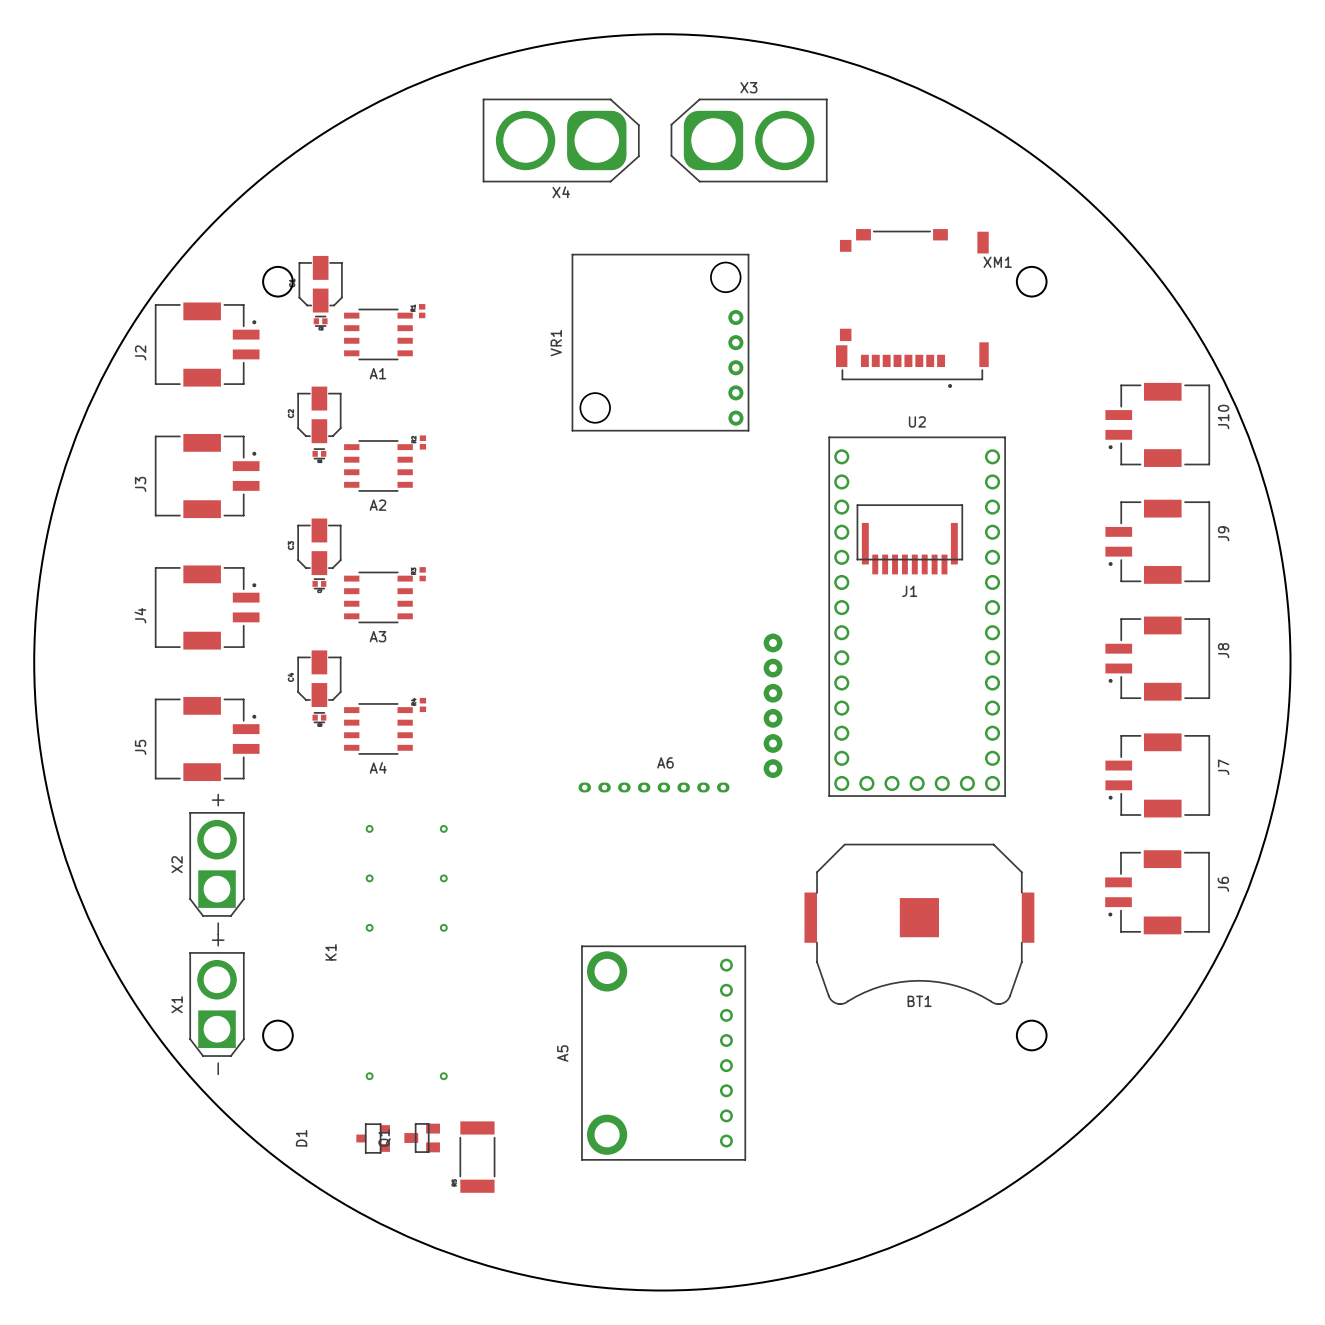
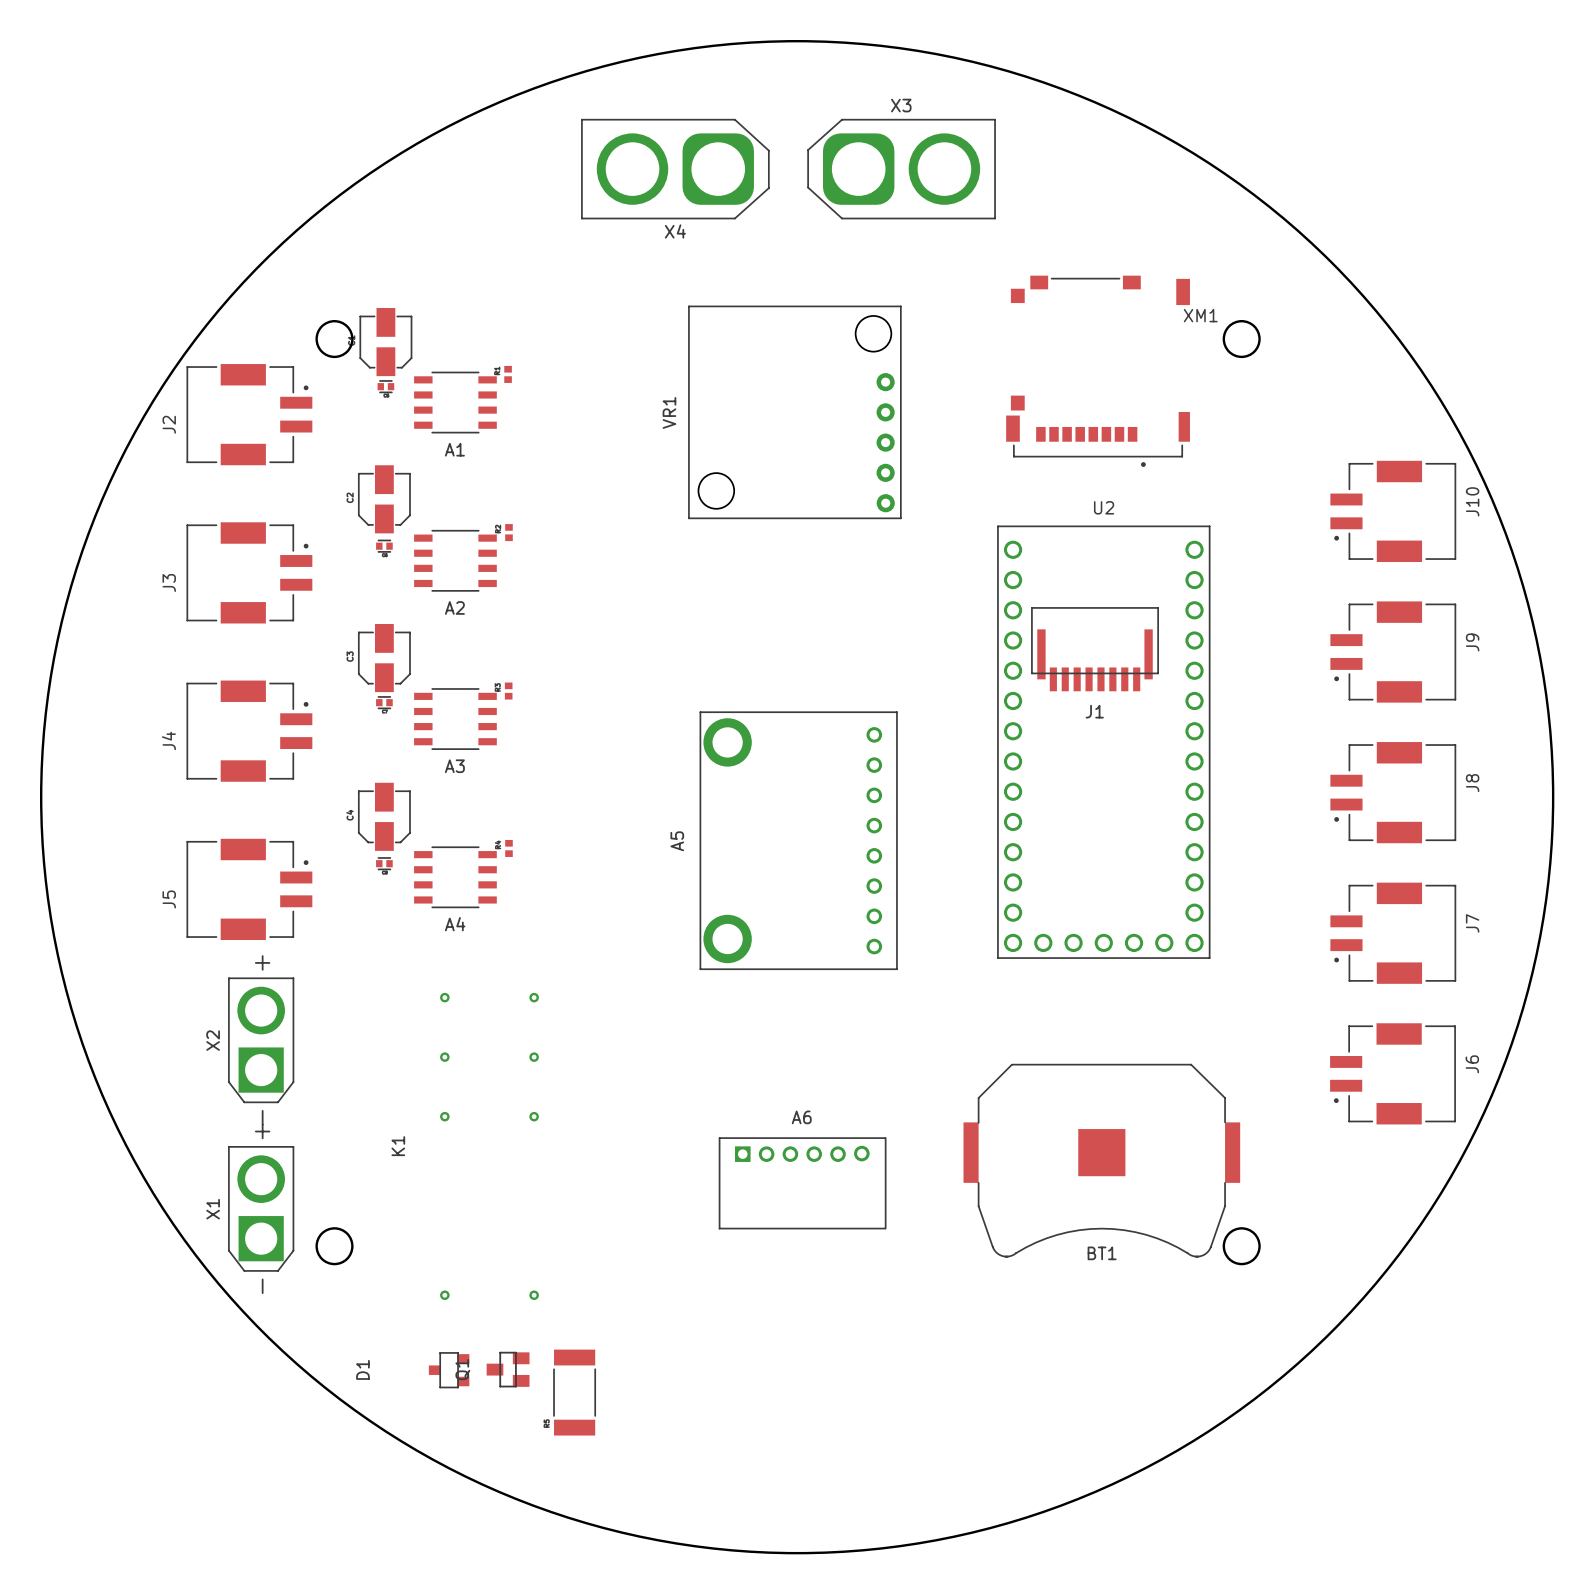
A6 footprint: [578, 633, 783, 793] -> [718, 1137, 887, 1230]
A6 name position: A6 (665, 762) -> A6 (801, 1117)
BT1 position: (919, 924) -> (1101, 1160)
A5 footprint: [581, 945, 746, 1161] -> [699, 711, 898, 970]

